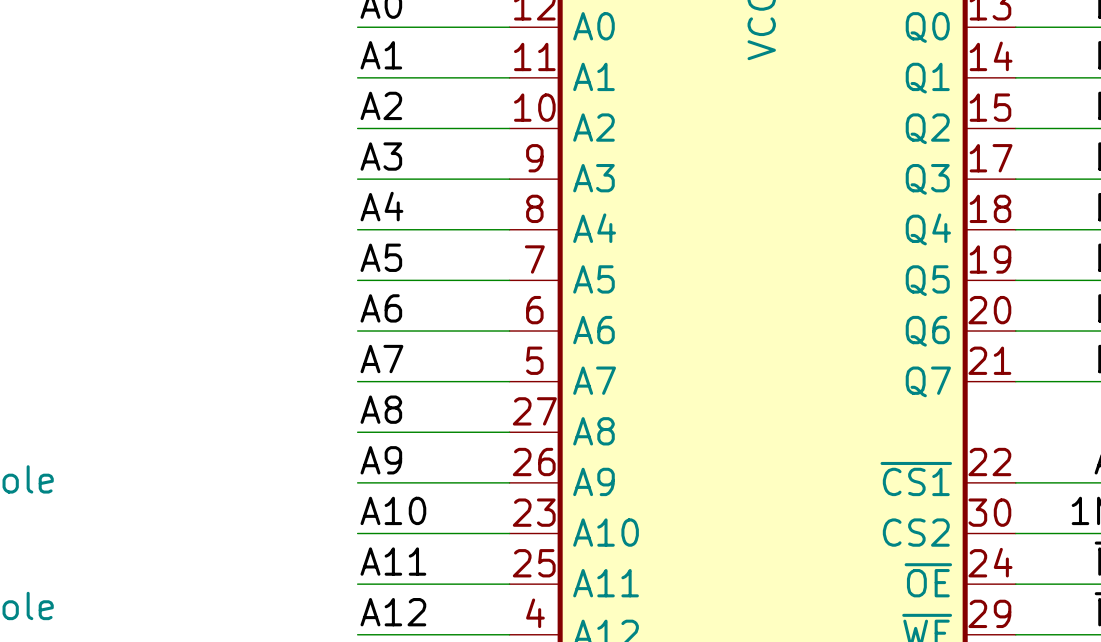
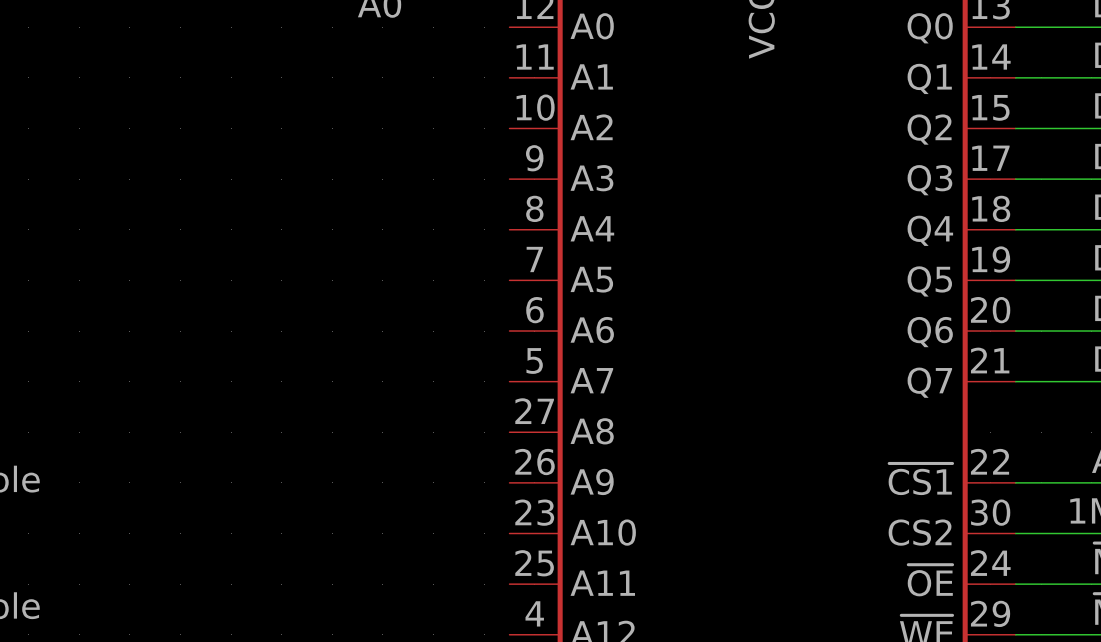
wire: (357, 27) (509, 27) -> none
label: A1 (381, 55) -> none
wire: (357, 77) (509, 77) -> none
label: A2 (381, 105) -> none
wire: (357, 128) (509, 128) -> none
label: A3 (381, 156) -> none
wire: (357, 179) (509, 179) -> none
label: A4 (381, 206) -> none
wire: (357, 229) (509, 229) -> none
label: A5 (381, 257) -> none
wire: (357, 280) (509, 280) -> none
label: A6 (381, 308) -> none
wire: (357, 331) (509, 331) -> none
label: A7 (381, 359) -> none
wire: (357, 381) (509, 381) -> none
label: A8 (381, 409) -> none
wire: (357, 432) (509, 432) -> none
label: A9 (381, 460) -> none
wire: (357, 482) (509, 482) -> none
label: A10 (393, 510) -> none
wire: (357, 533) (509, 533) -> none
label: A11 (393, 561) -> none
wire: (357, 584) (509, 584) -> none
label: A12 (393, 612) -> none
wire: (357, 634) (509, 634) -> none

